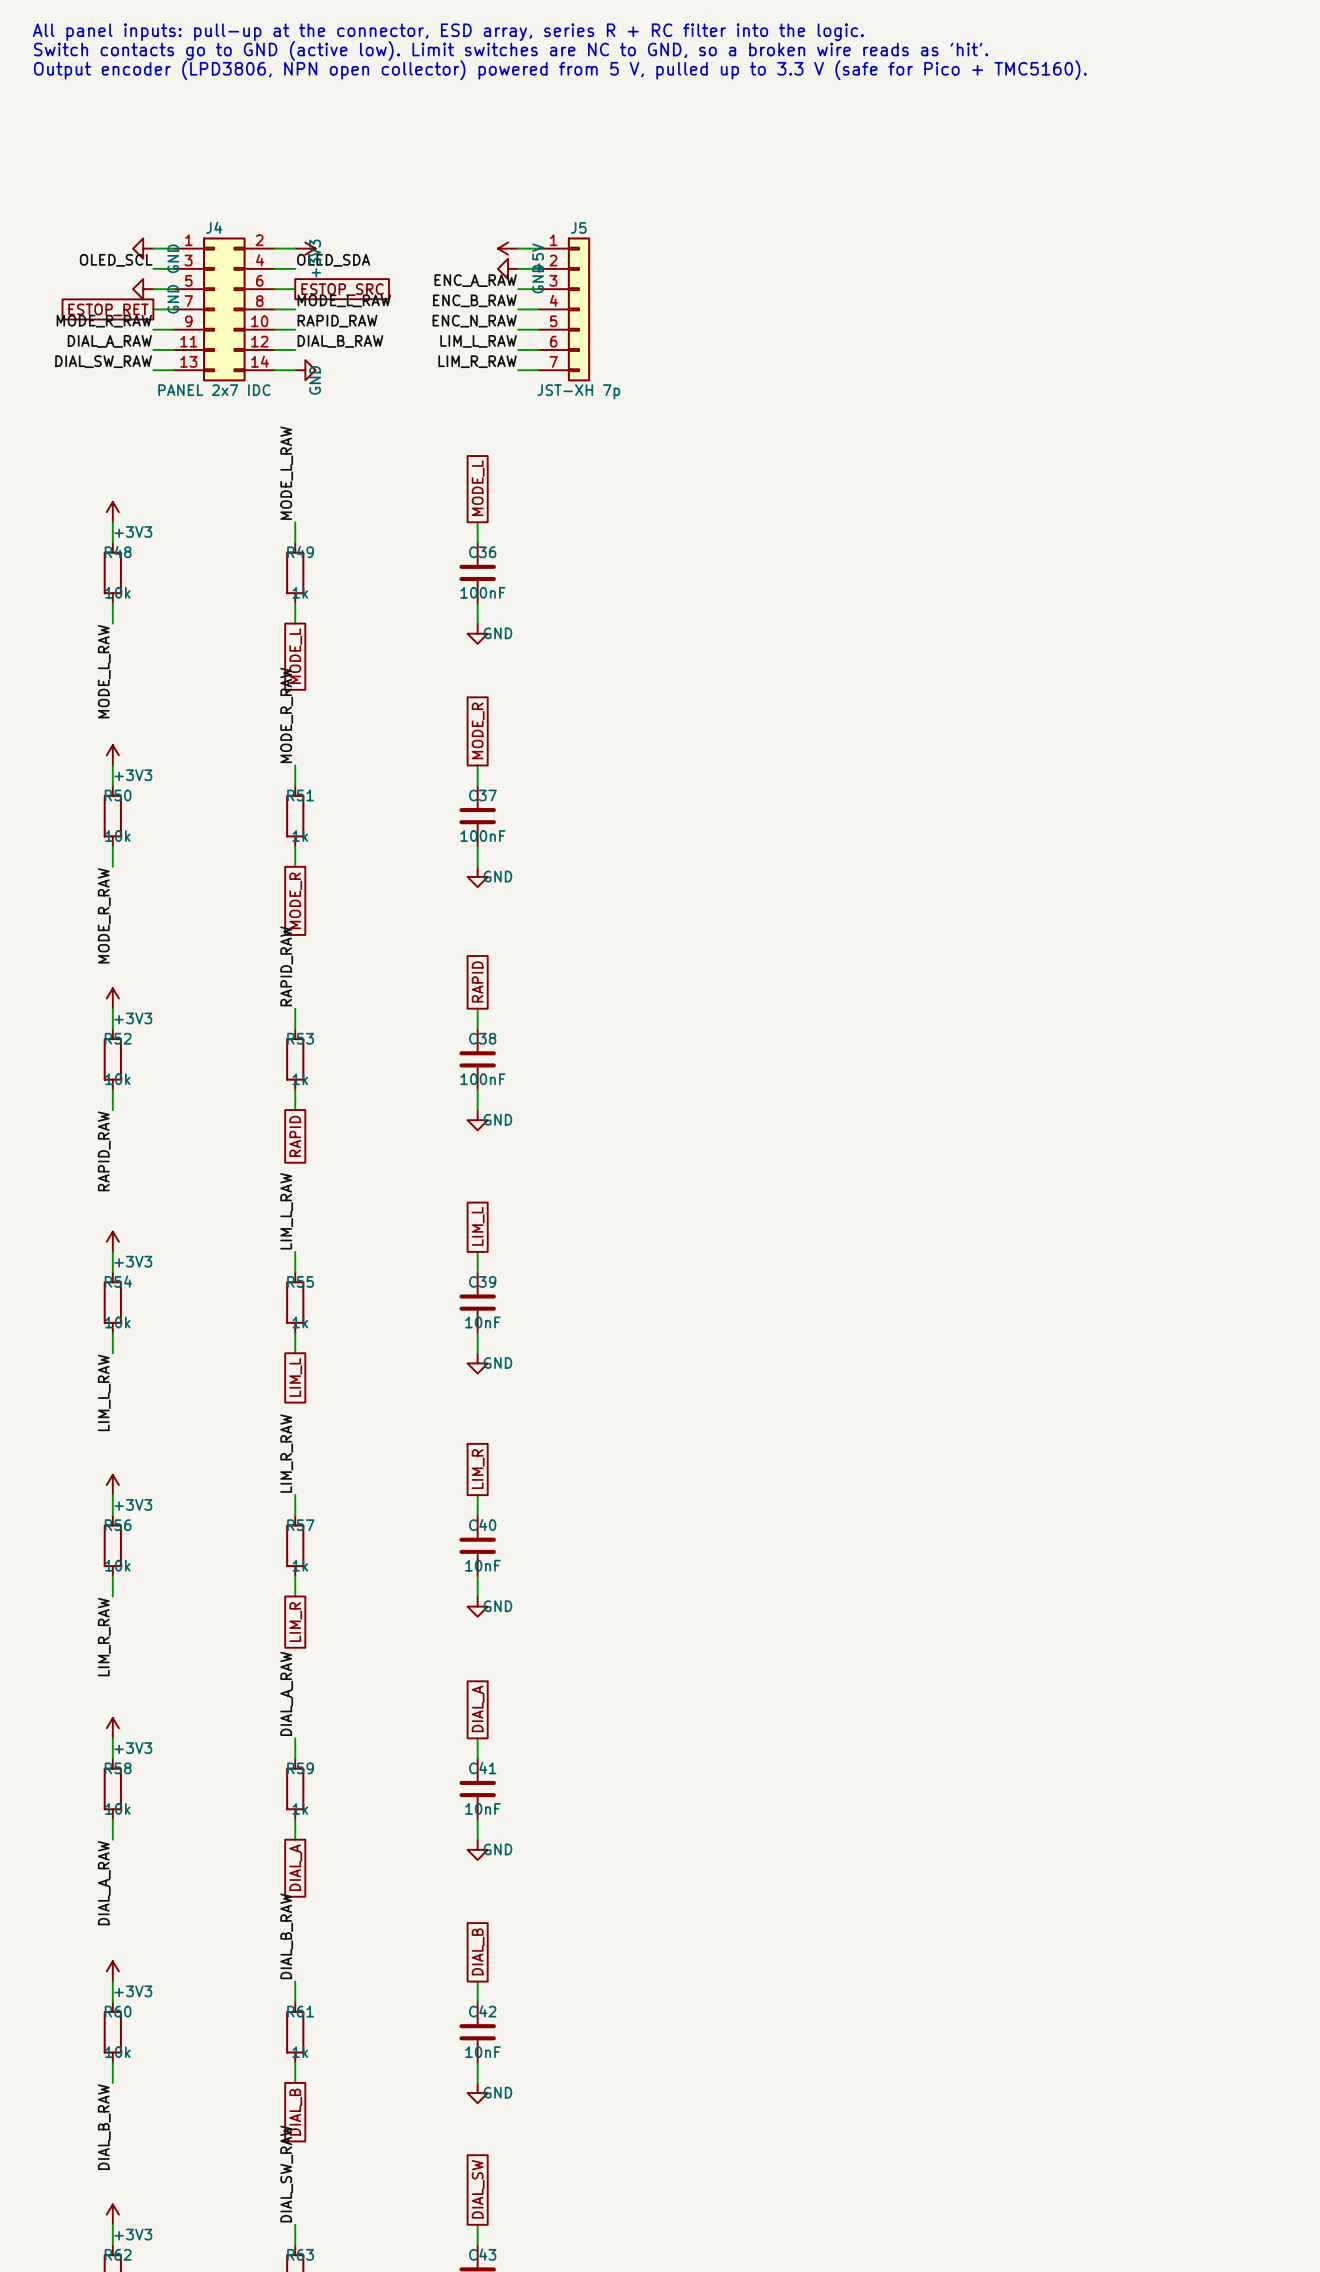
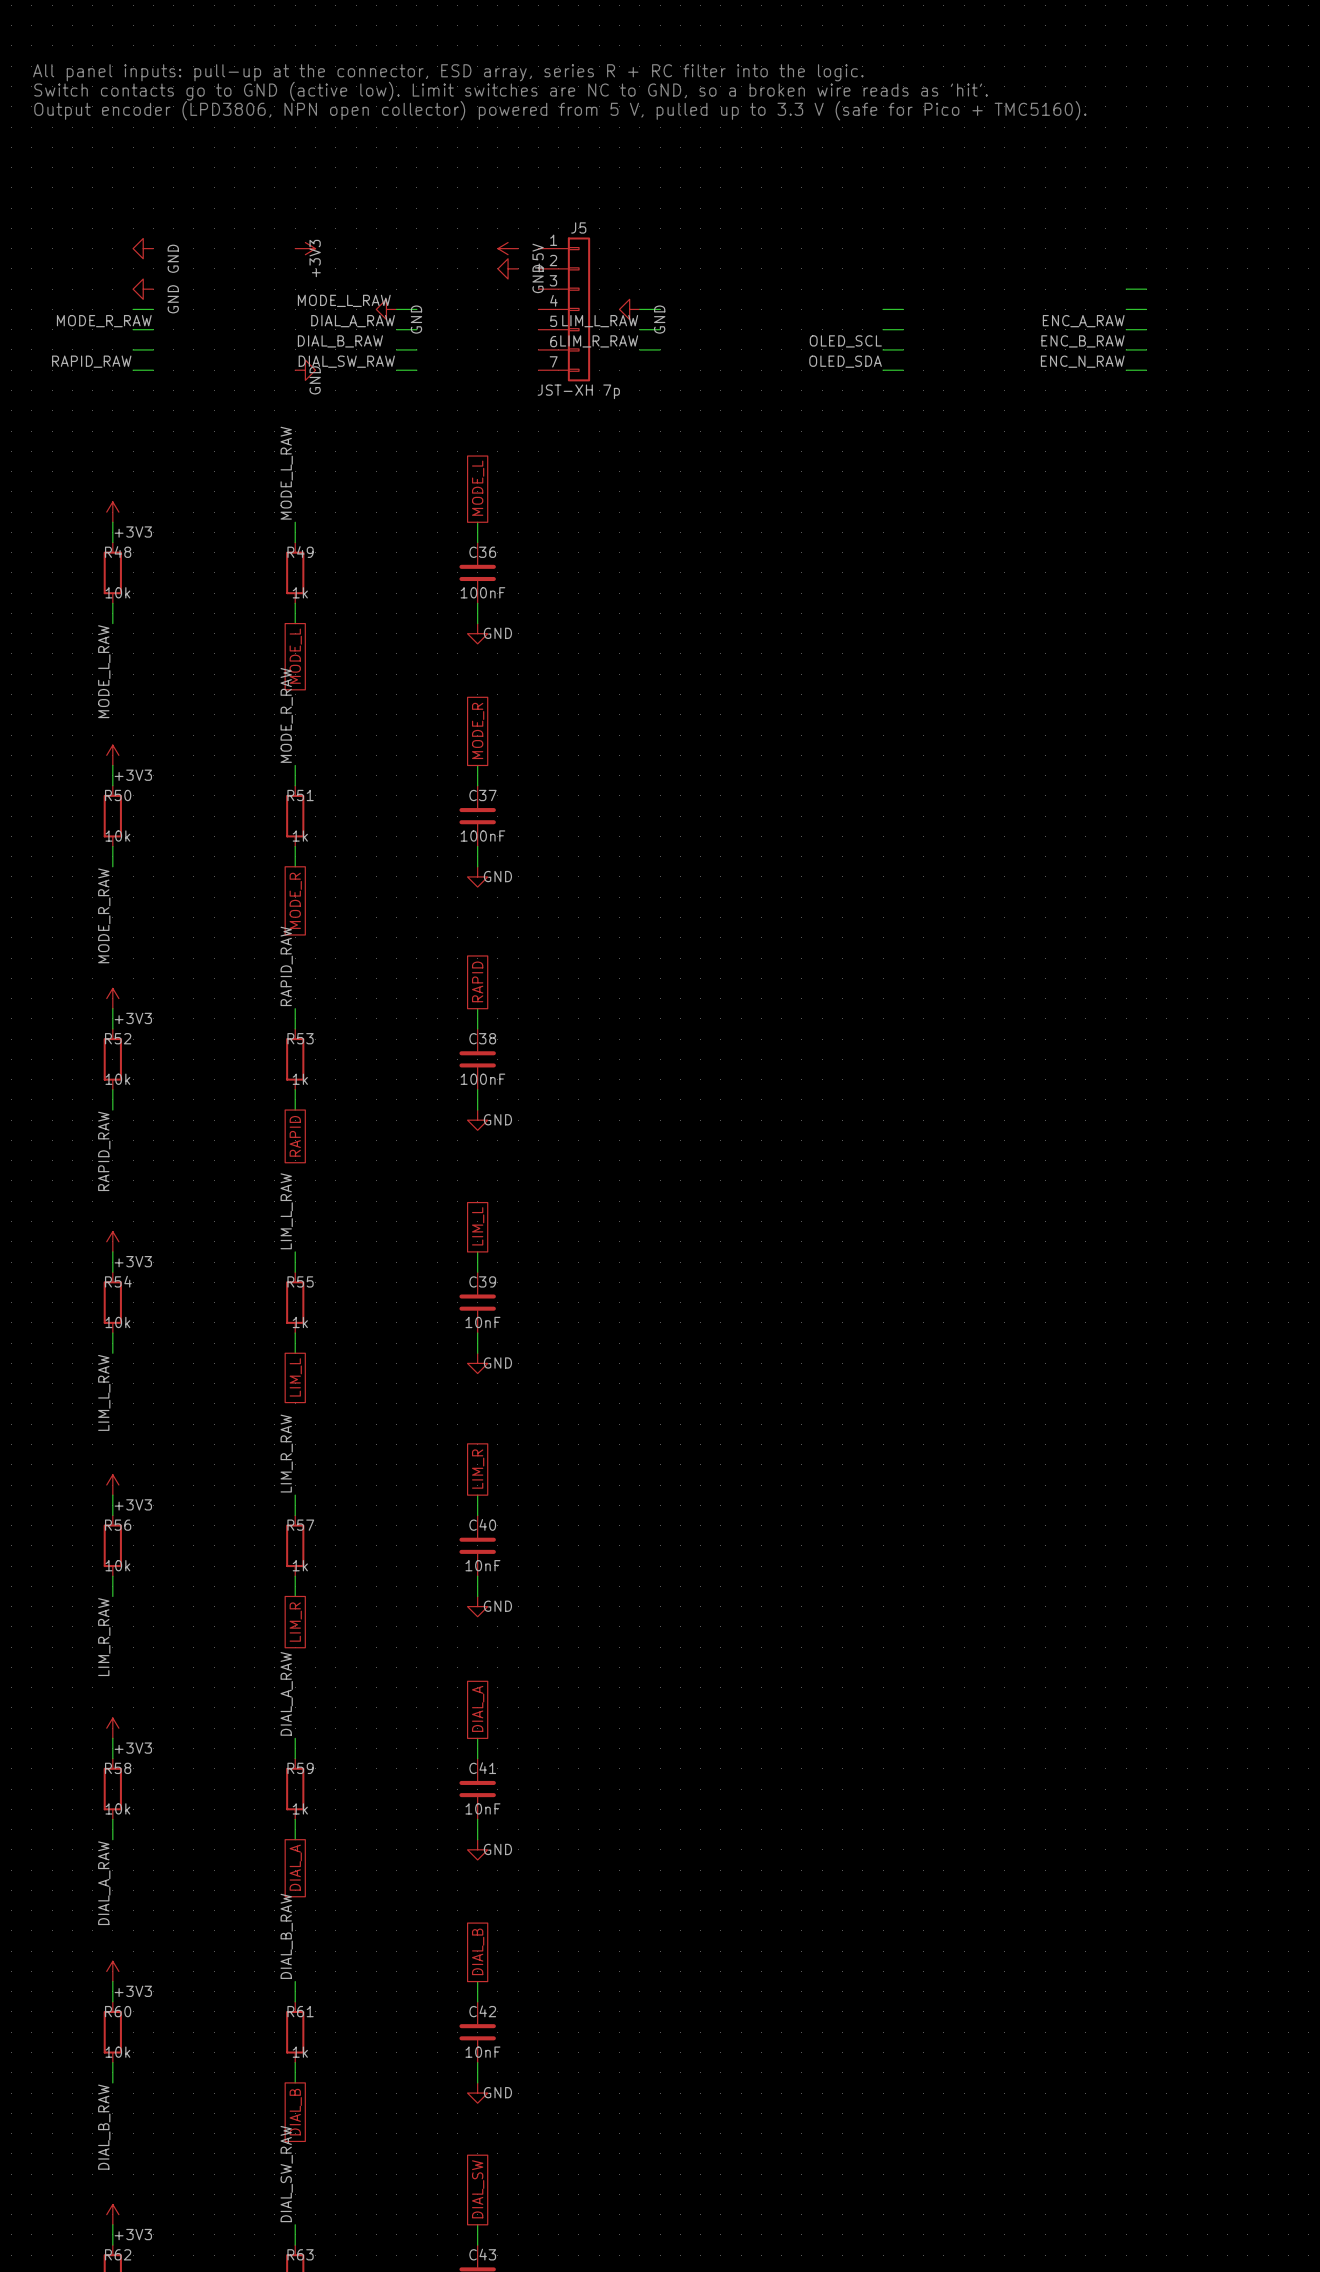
text position: All panel inputs: pull-up at the connector, ESD array, series R + RC filter into the logic. (448, 32) -> All panel inputs: pull-up at the connector, ESD array, series R + RC filter into the logic. (448, 72)
text position: Switch contacts go to GND (active low). Limit switches are NC to GND, so a broken wire reads as 'hit'. (511, 50) -> Switch contacts go to GND (active low). Limit switches are NC to GND, so a broken wire reads as 'hit'. (511, 91)
text position: Output encoder (LPD3806, NPN open collector) powered from 5 V, pulled up to 3.3 V (safe for Pico + TMC5160). (560, 70) -> Output encoder (LPD3806, NPN open collector) powered from 5 V, pulled up to 3.3 V (safe for Pico + TMC5160). (560, 110)
wire: (153, 248) (173, 248) -> none
wire: (274, 248) (295, 248) -> none
wire: (518, 248) (538, 248) -> none
label: OLED_SCL (116, 260) -> none
label: OLED_SDA (333, 260) -> none
wire: (153, 268) (173, 268) -> none
wire: (274, 268) (295, 268) -> none
wire: (518, 268) (538, 268) -> none
label: ENC_A_RAW (475, 280) -> none
wire: (153, 289) (173, 289) -> none
wire: (274, 289) (295, 289) -> none
global label: ESTOP_SRC (342, 289) -> none
wire: (518, 289) (538, 289) -> none
wire: none -> (1126, 289) (1146, 289)
label: ENC_B_RAW (474, 300) -> none
global label: ESTOP_RET (108, 309) -> none
wire: (153, 309) (173, 309) -> (153, 309) (133, 309)
J4: PANEL 2x7 IDC (224, 309) -> none
wire: (274, 309) (295, 309) -> (396, 309) (416, 309)
power symbol: none -> GND (386, 309)
wire: (518, 309) (538, 309) -> (639, 309) (660, 309)
power symbol: none -> GND (629, 309)
wire: none -> (883, 309) (903, 309)
wire: none -> (1126, 309) (1146, 309)
label position: RAPID_RAW (337, 321) -> RAPID_RAW (91, 361)
label: none -> DIAL_A_RAW (353, 321)
label: ENC_N_RAW (474, 321) -> none
label: none -> ENC_A_RAW (1083, 321)
wire: (153, 329) (173, 329) -> (153, 329) (133, 329)
wire: (274, 329) (295, 329) -> (396, 329) (416, 329)
wire: (518, 329) (538, 329) -> (639, 329) (660, 329)
wire: none -> (883, 329) (903, 329)
wire: none -> (1126, 329) (1146, 329)
label: DIAL_A_RAW (109, 341) -> none
label position: LIM_L_RAW (478, 341) -> LIM_L_RAW (600, 321)
label: none -> OLED_SCL (845, 341)
label: none -> ENC_B_RAW (1082, 341)
wire: (153, 349) (173, 349) -> (153, 349) (133, 349)
wire: (274, 349) (295, 349) -> (396, 349) (416, 349)
wire: (518, 349) (538, 349) -> (639, 349) (660, 349)
wire: none -> (883, 349) (903, 349)
wire: none -> (1126, 349) (1146, 349)
label: DIAL_SW_RAW (103, 361) -> none
label: none -> DIAL_SW_RAW (346, 361)
label position: LIM_R_RAW (477, 361) -> LIM_R_RAW (599, 341)
label: none -> OLED_SDA (845, 361)
label: none -> ENC_N_RAW (1082, 361)
wire: (153, 370) (173, 370) -> (153, 370) (133, 370)
wire: (274, 370) (295, 370) -> (396, 370) (416, 370)
wire: (518, 370) (538, 370) -> none
wire: none -> (883, 370) (903, 370)
wire: none -> (1126, 370) (1146, 370)

